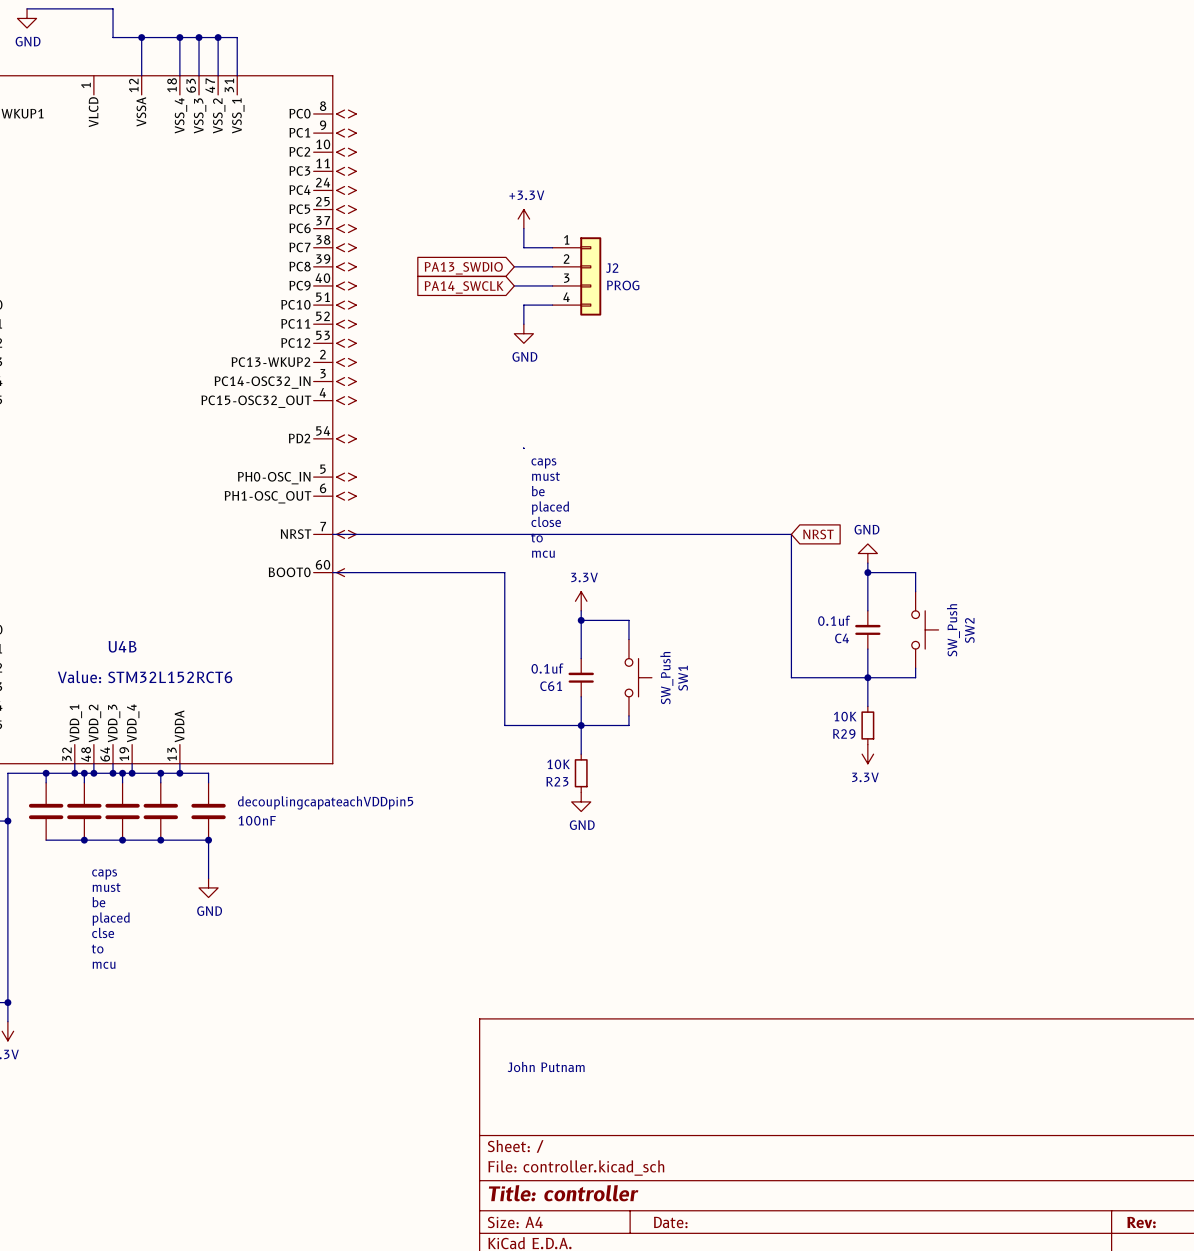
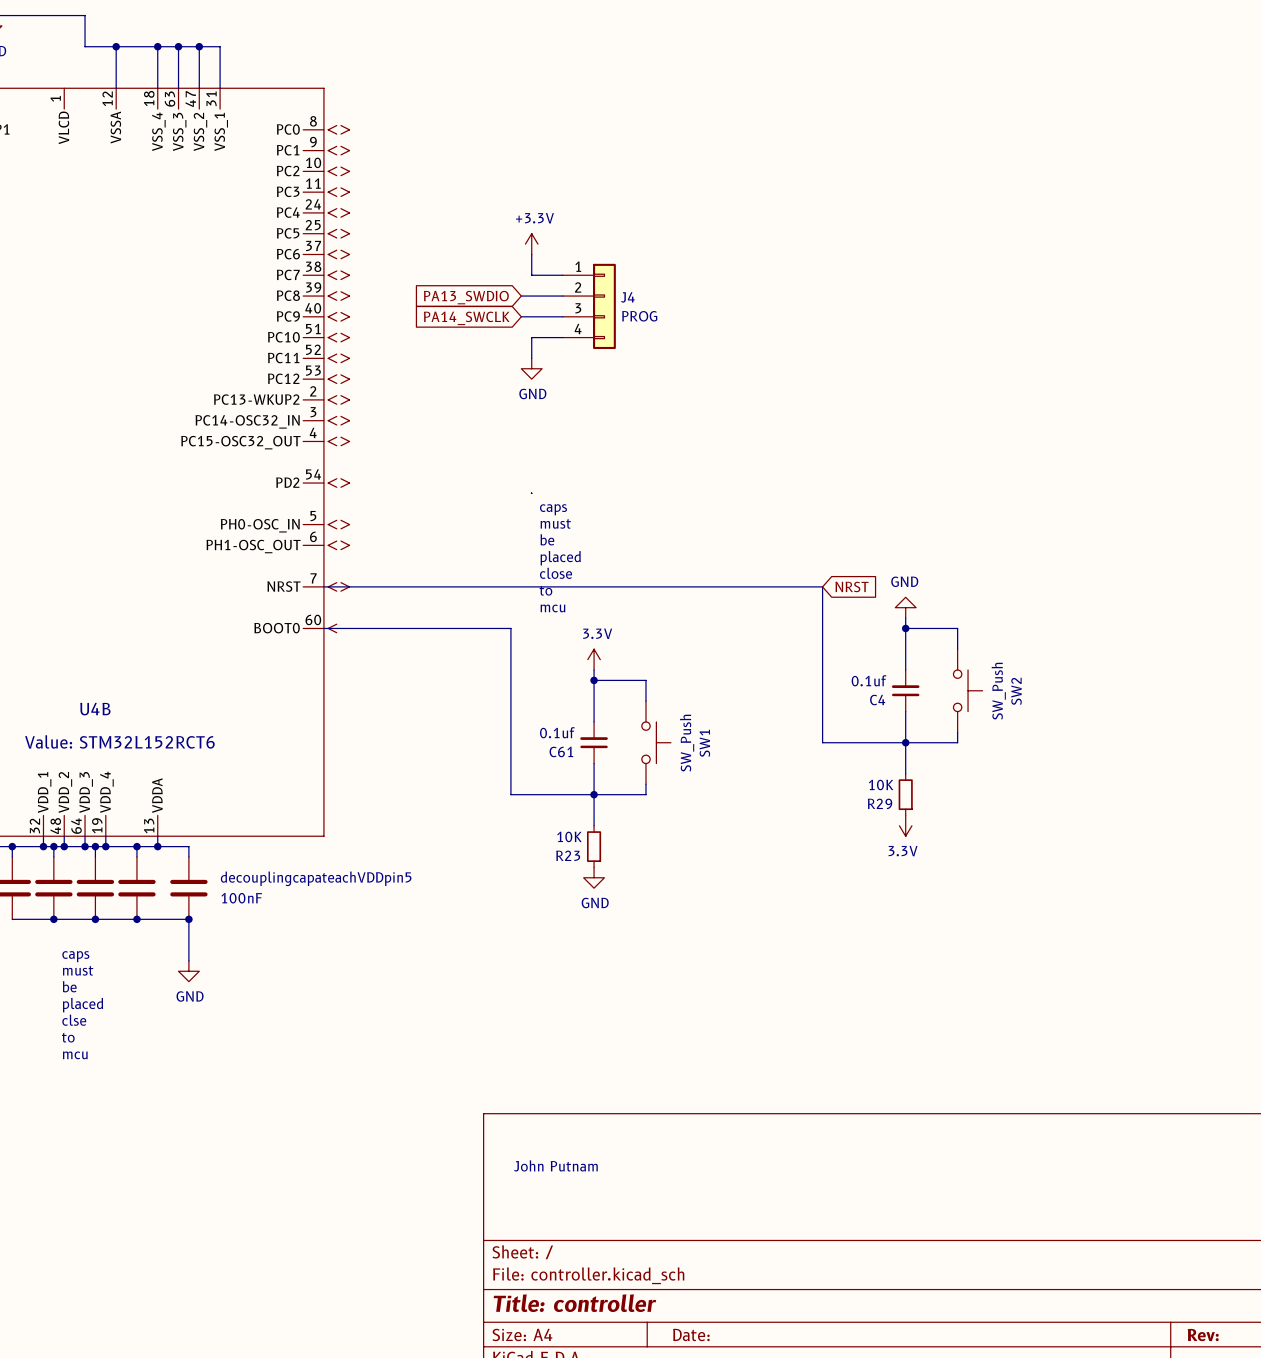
J2 name: J2 (612, 268) -> J4 (627, 297)

